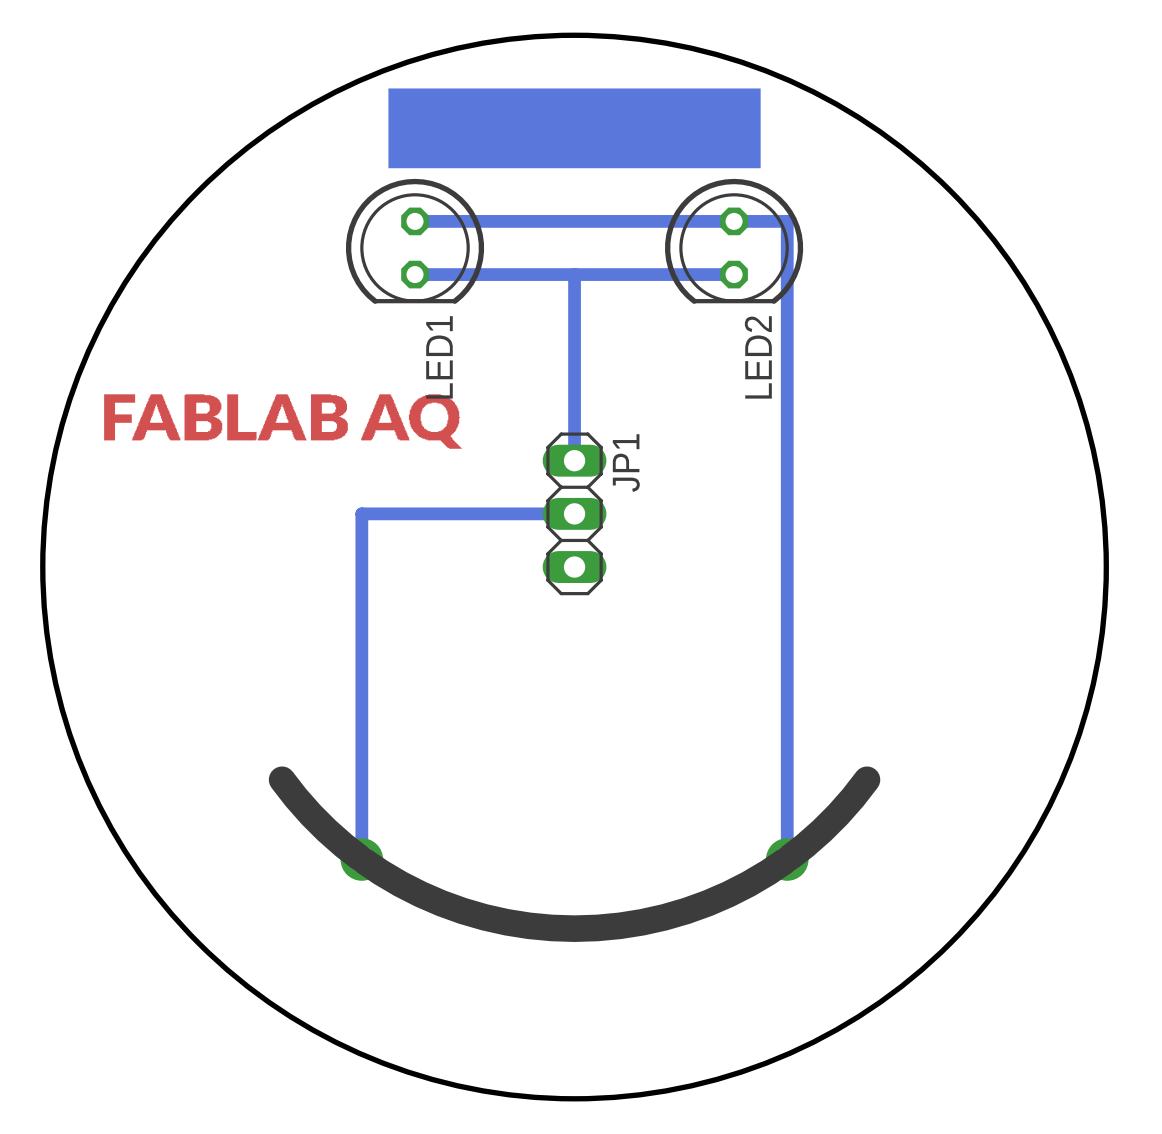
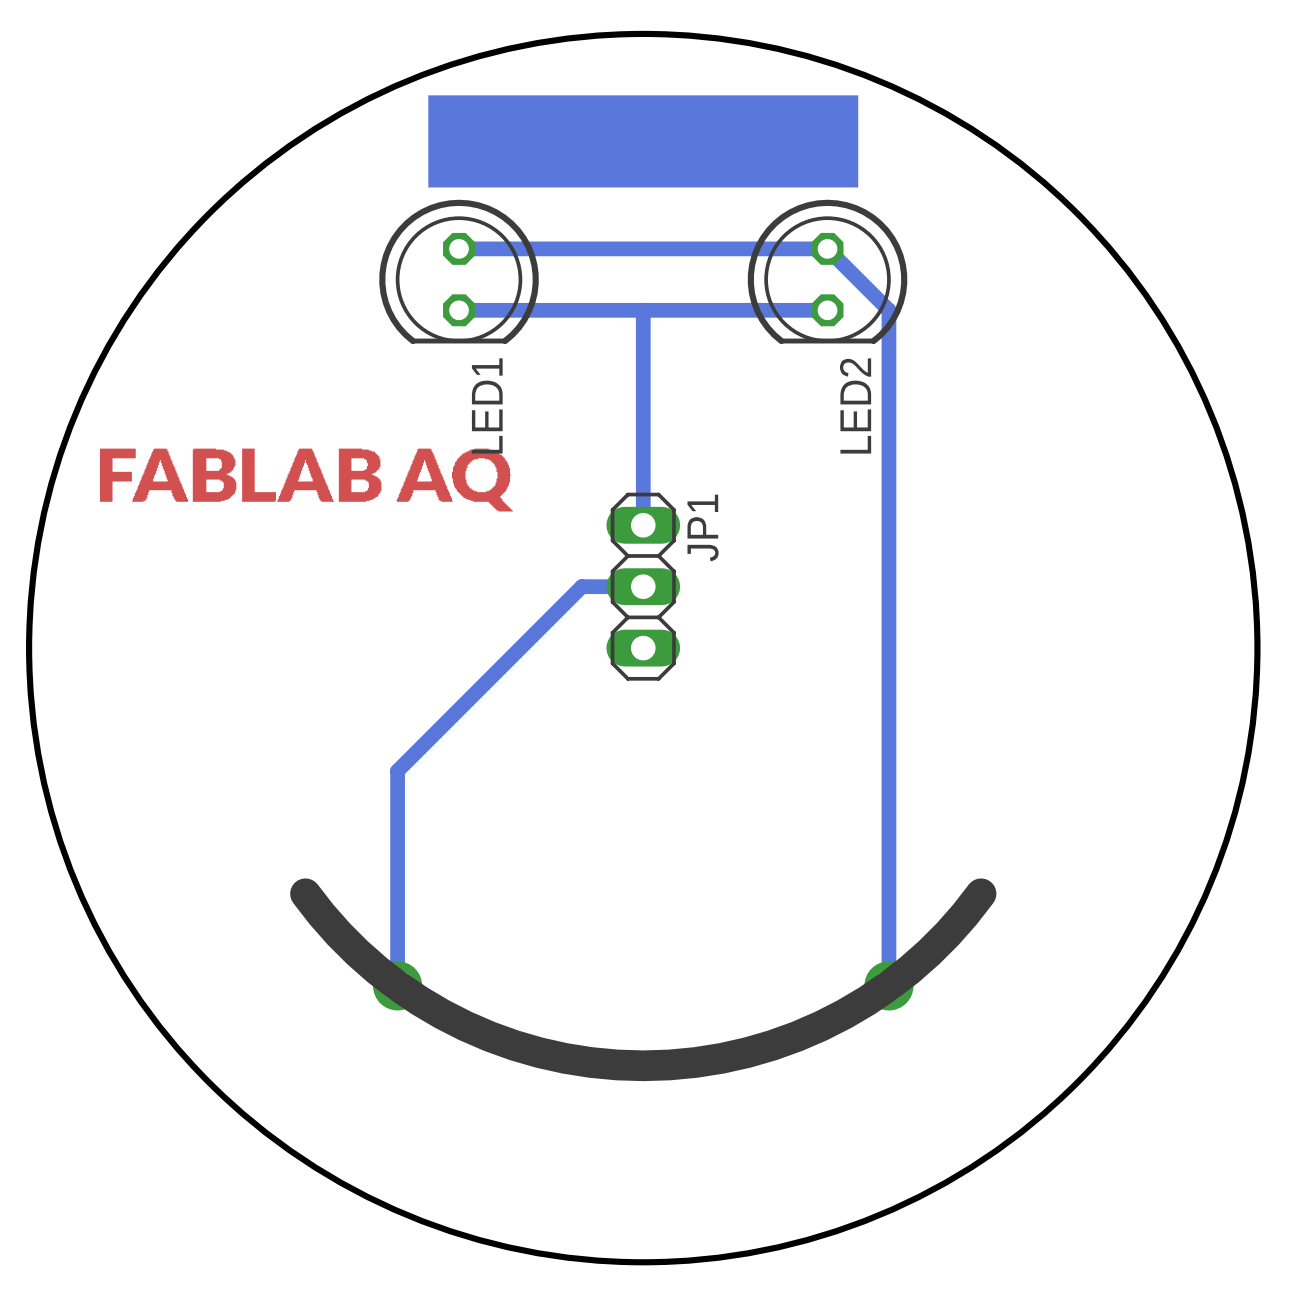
bottom track: (734, 221) (787, 221) (787, 274) -> (827, 248) (888, 310)
bottom track: (521, 513) (361, 513) (361, 673) -> (581, 586) (397, 770)

